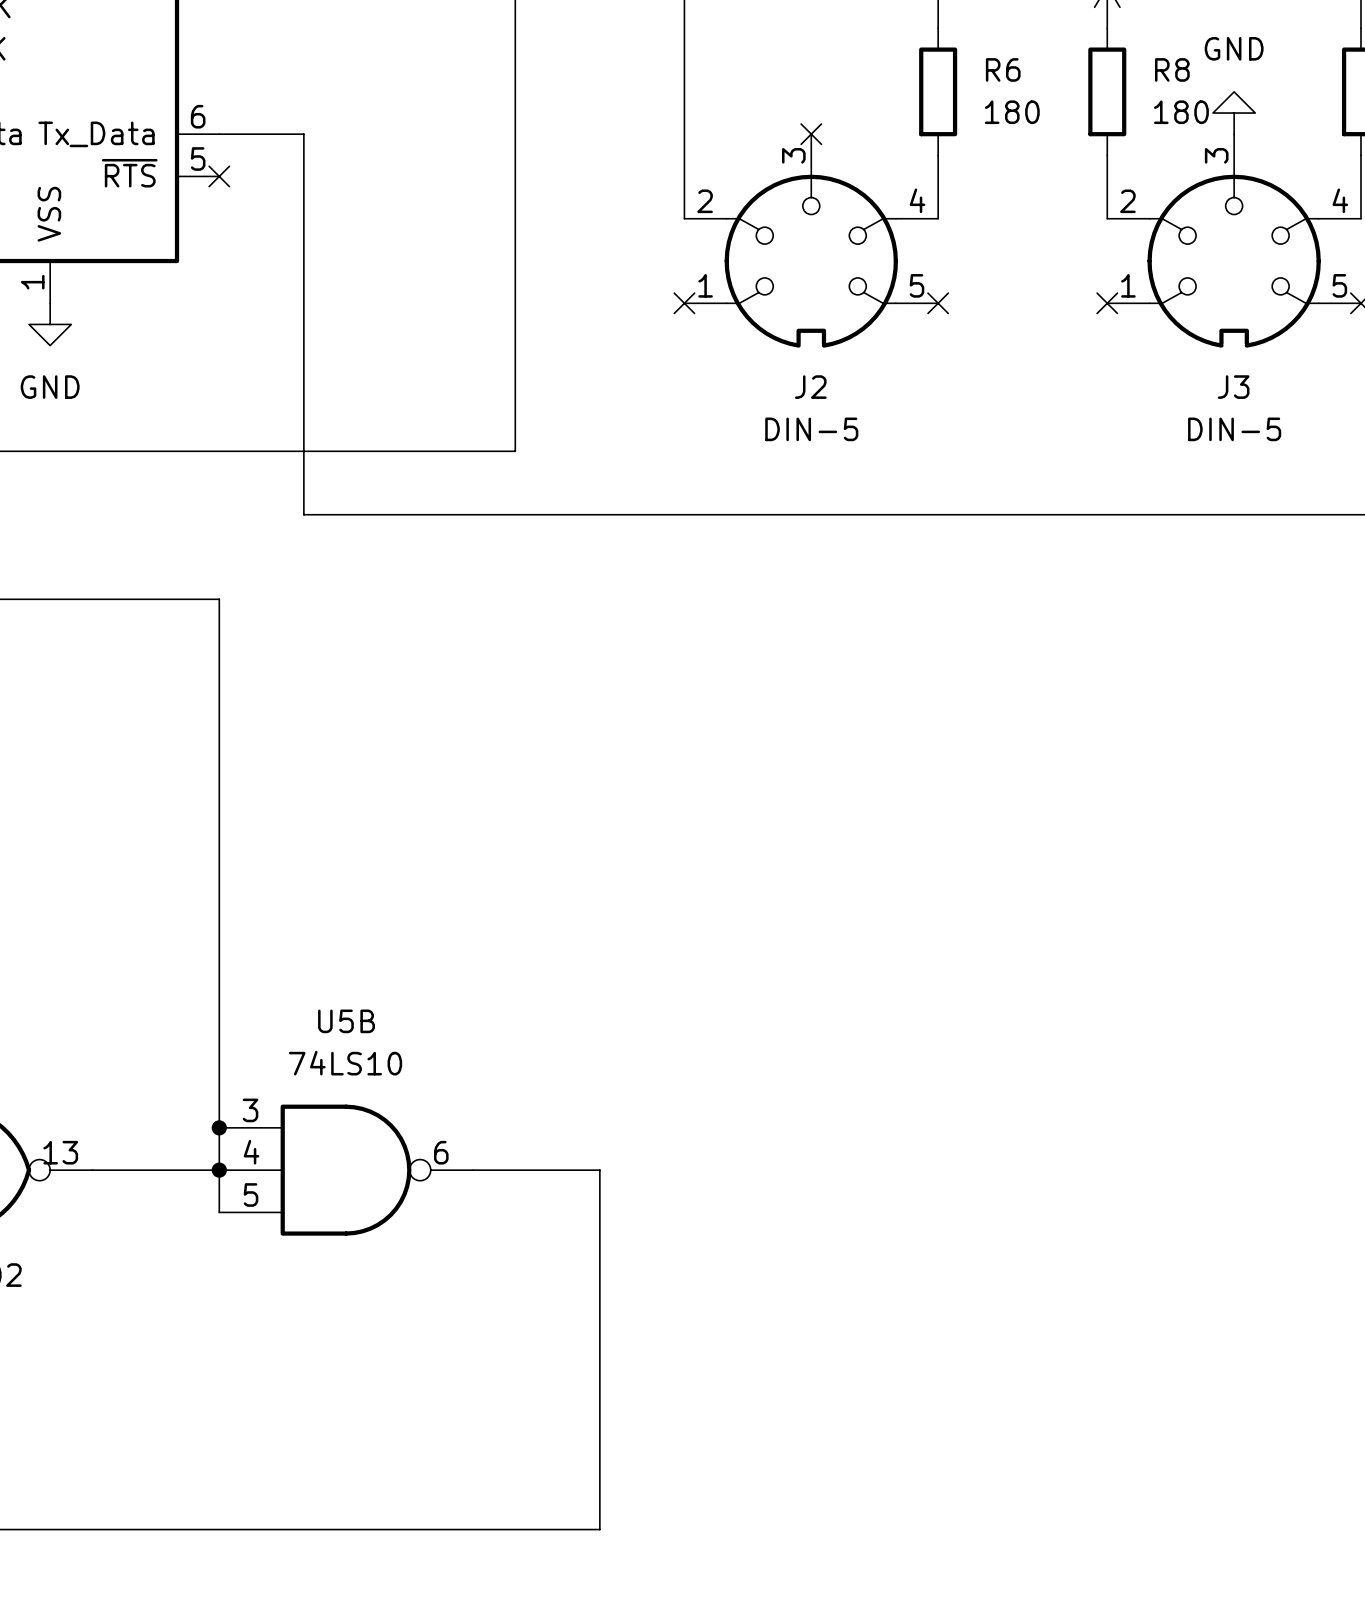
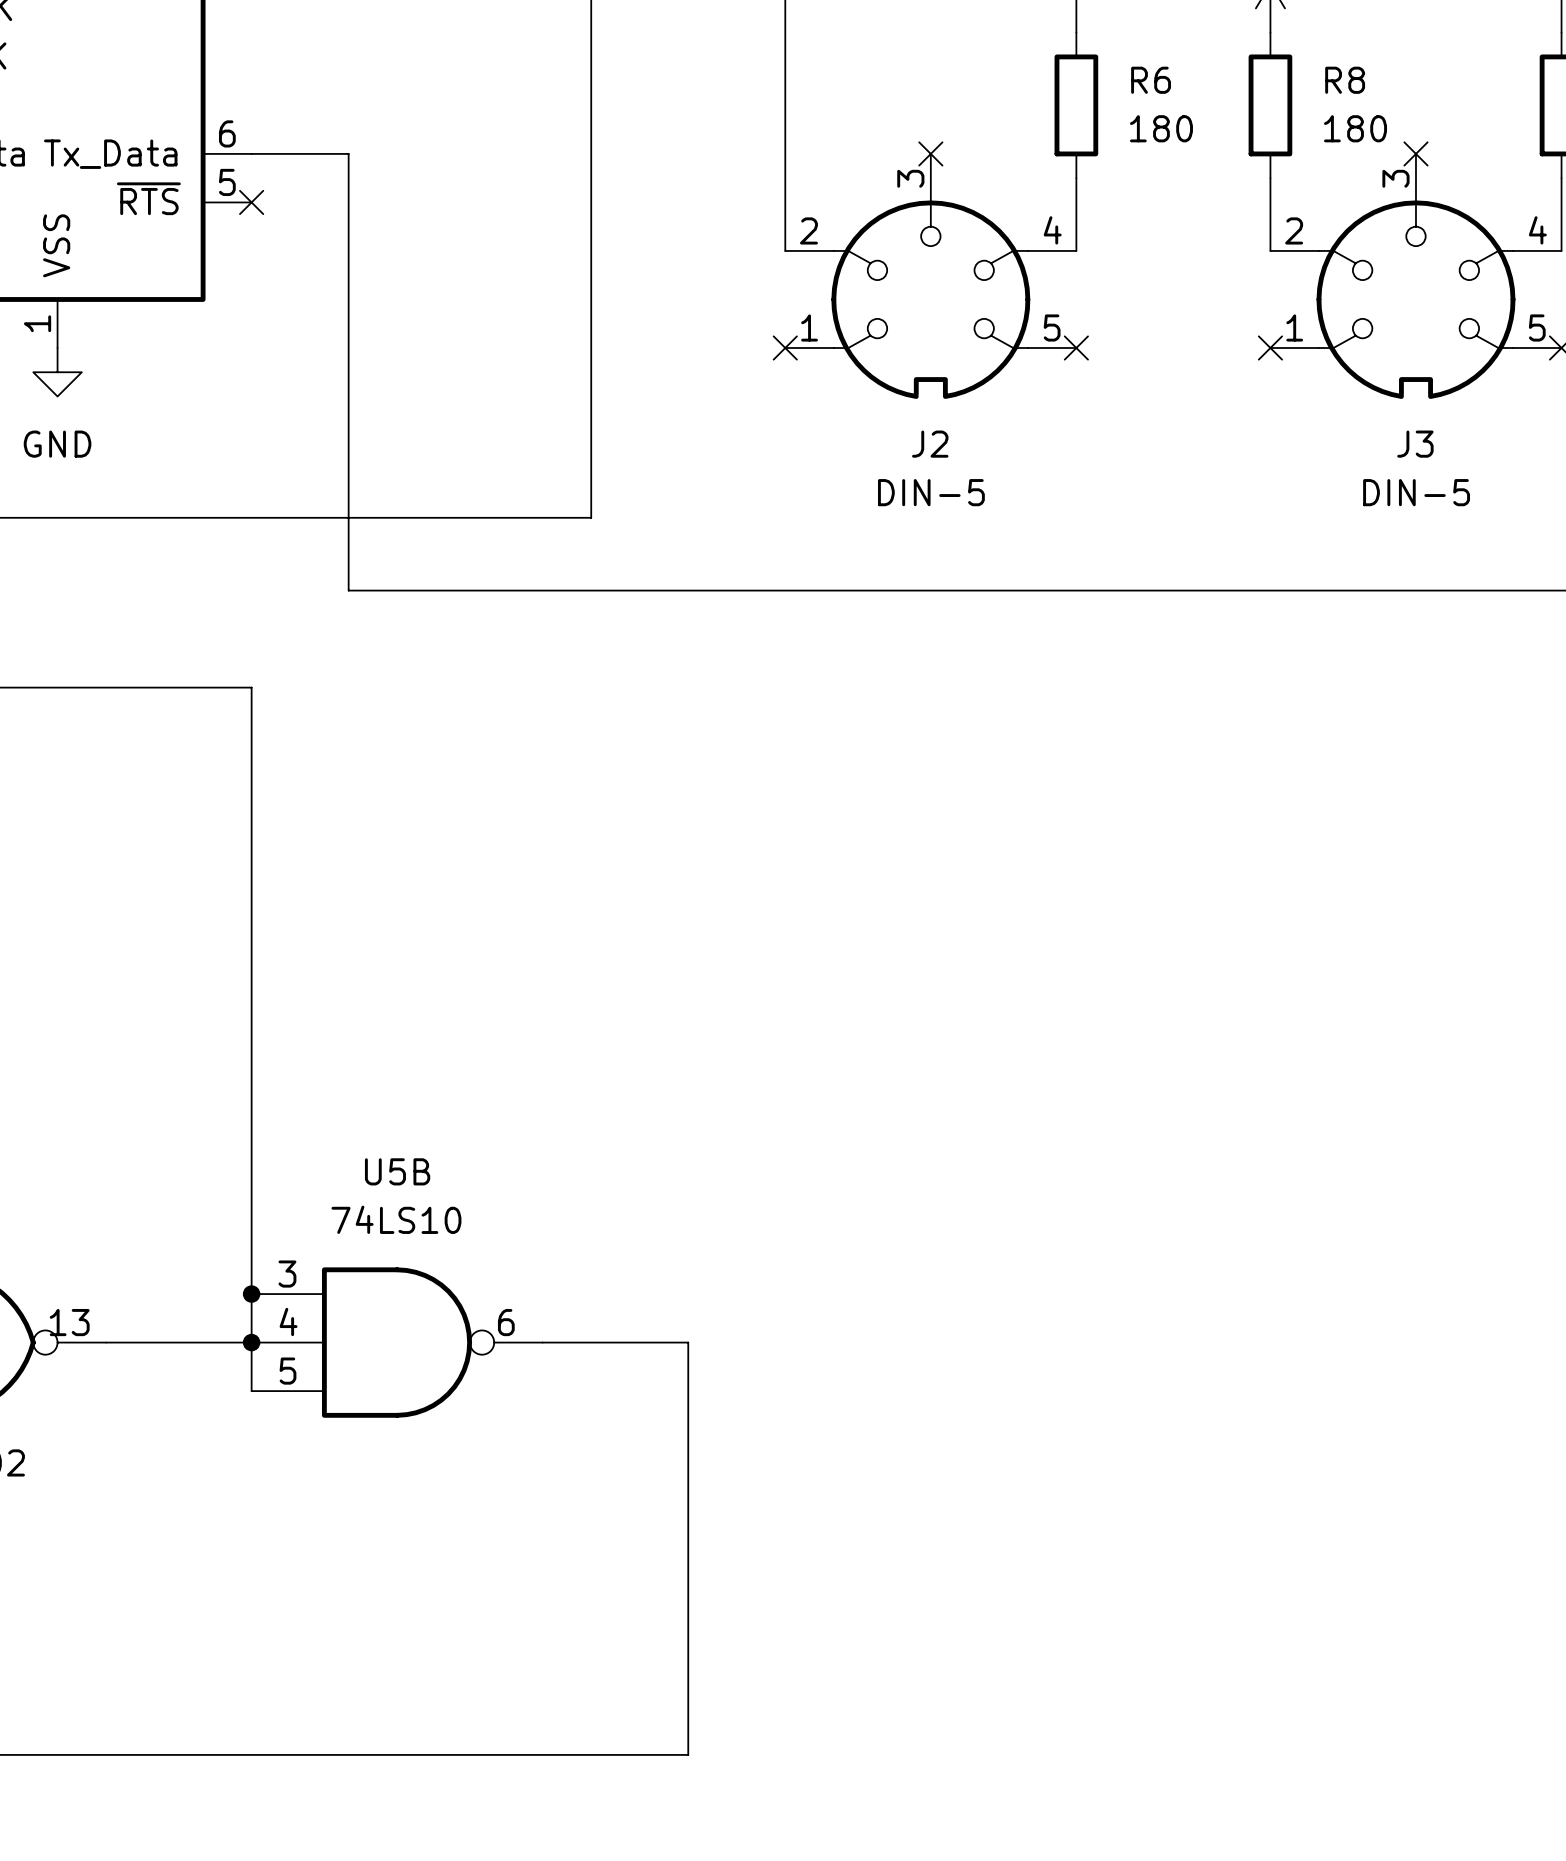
power symbol: GND (1234, 113) -> none
no-connect mark: none -> (1415, 153)

